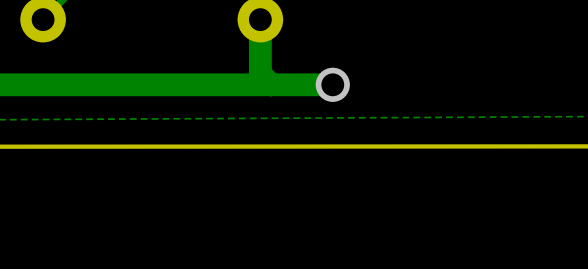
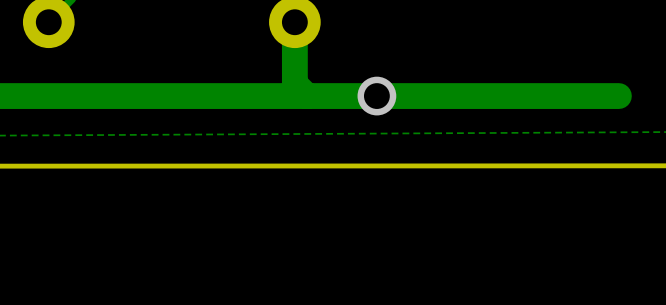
track: none -> (618, 96) (376, 96)

